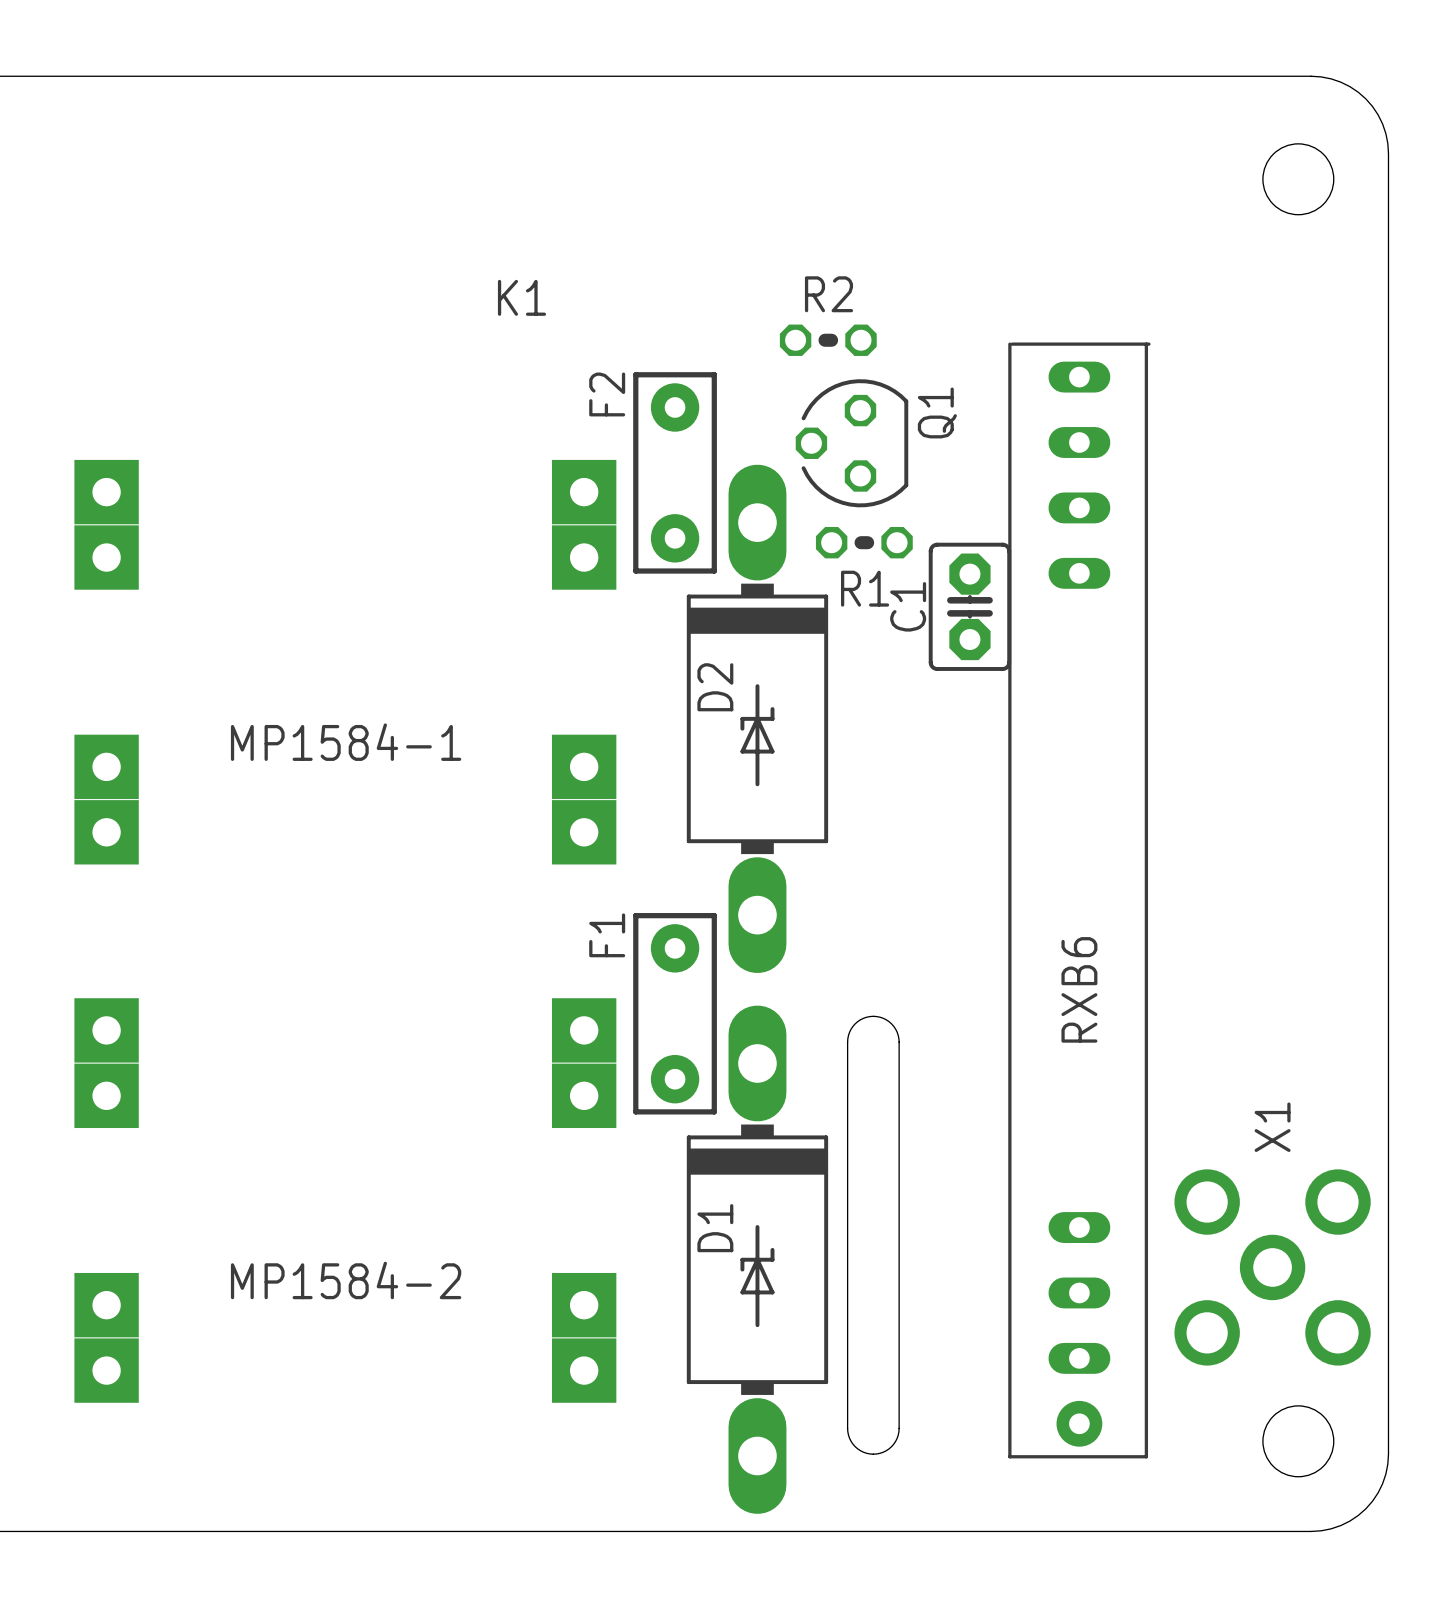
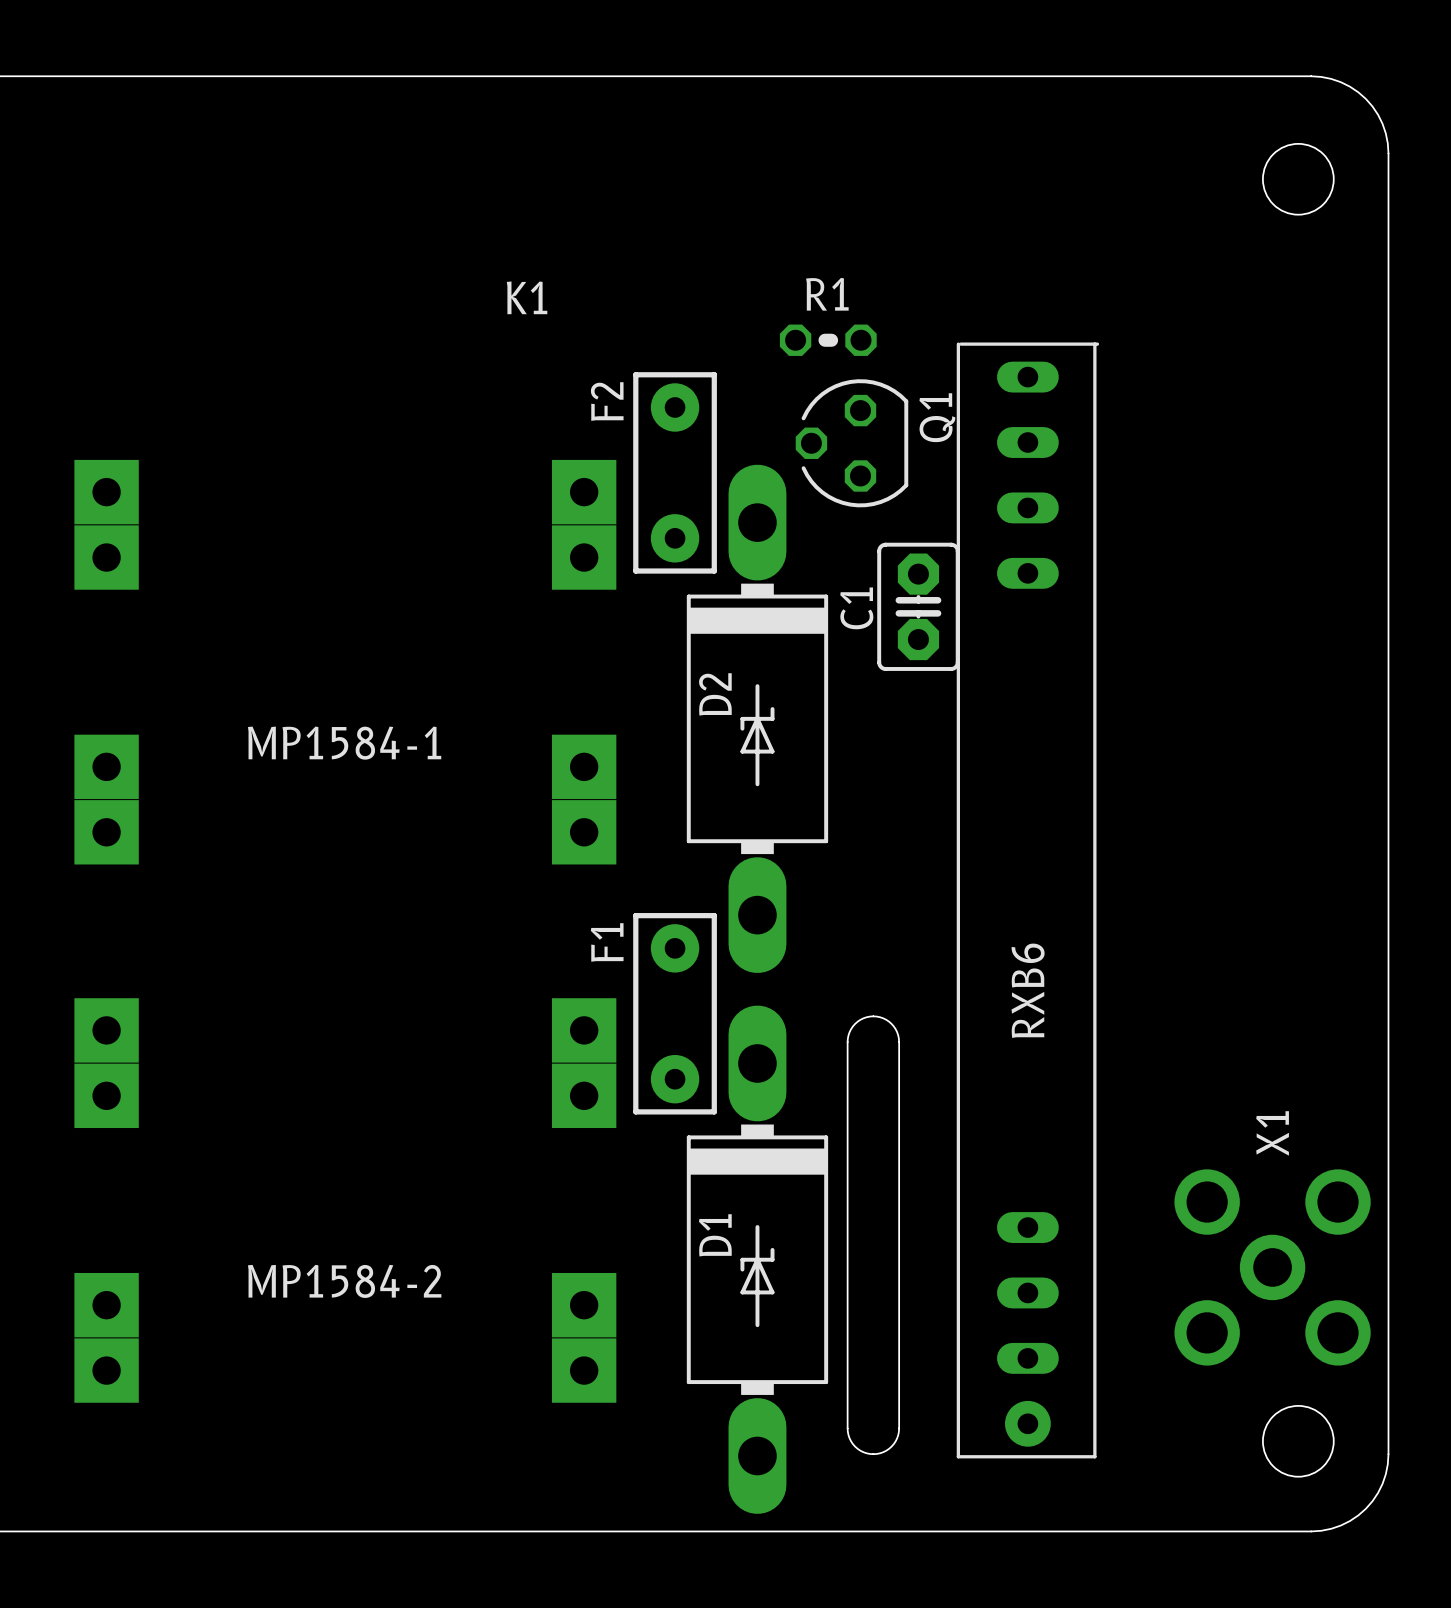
R2 name: R2 (829, 294) -> R1 (827, 294)
R1: (864, 542) -> none
C1 position: (969, 606) -> (918, 606)
RXB6 position: (1079, 900) -> (1027, 900)

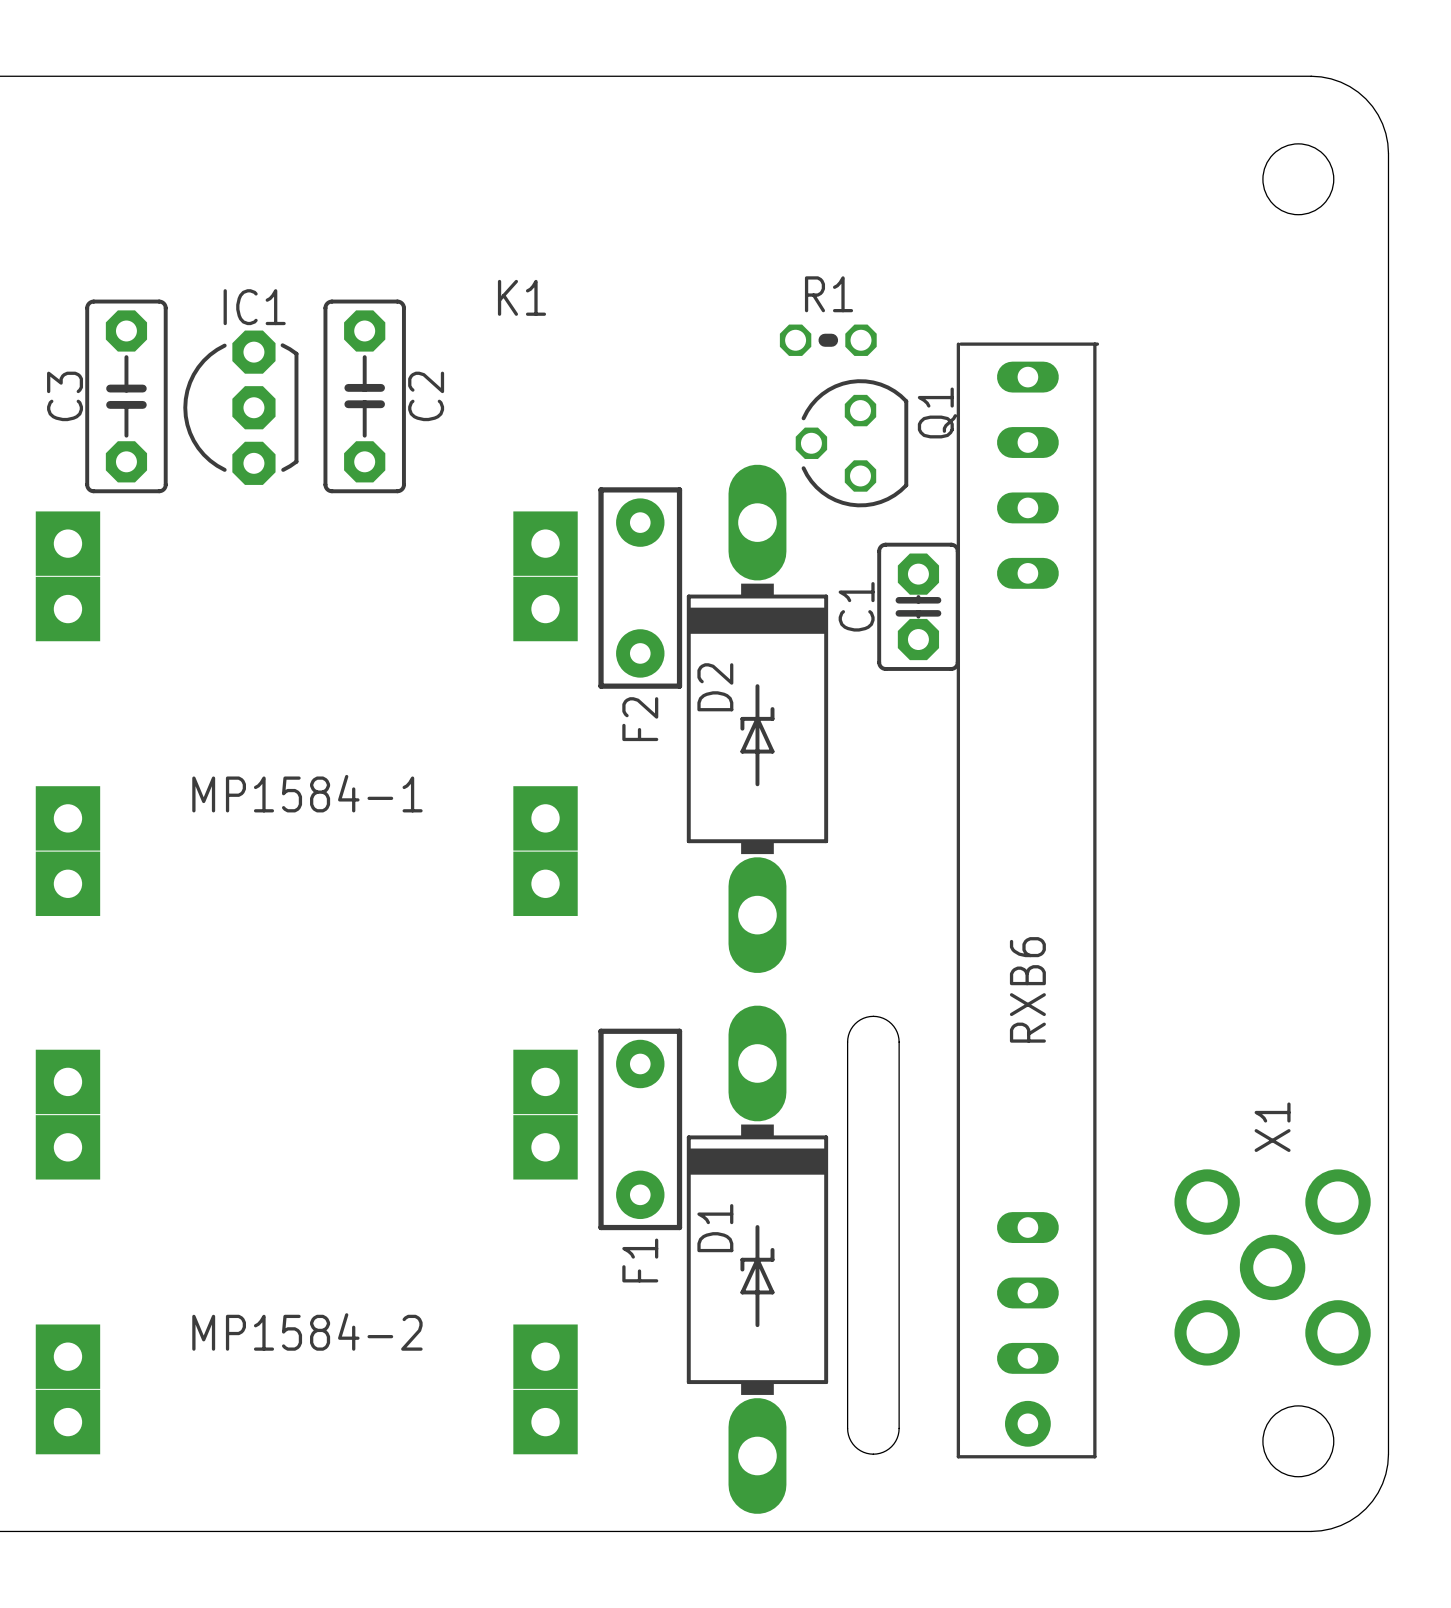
C3: none -> (126, 396)
C2: none -> (364, 396)
F2 name position: F2 (607, 401) -> F2 (640, 719)
IC1: none -> (240, 407)
F2 position: (675, 472) -> (640, 588)
MP1584-1 position: (345, 662) -> (306, 713)
F1 name position: F1 (607, 942) -> F1 (640, 1260)
F1 position: (675, 1013) -> (640, 1129)
MP1584-2 position: (345, 1200) -> (306, 1252)

